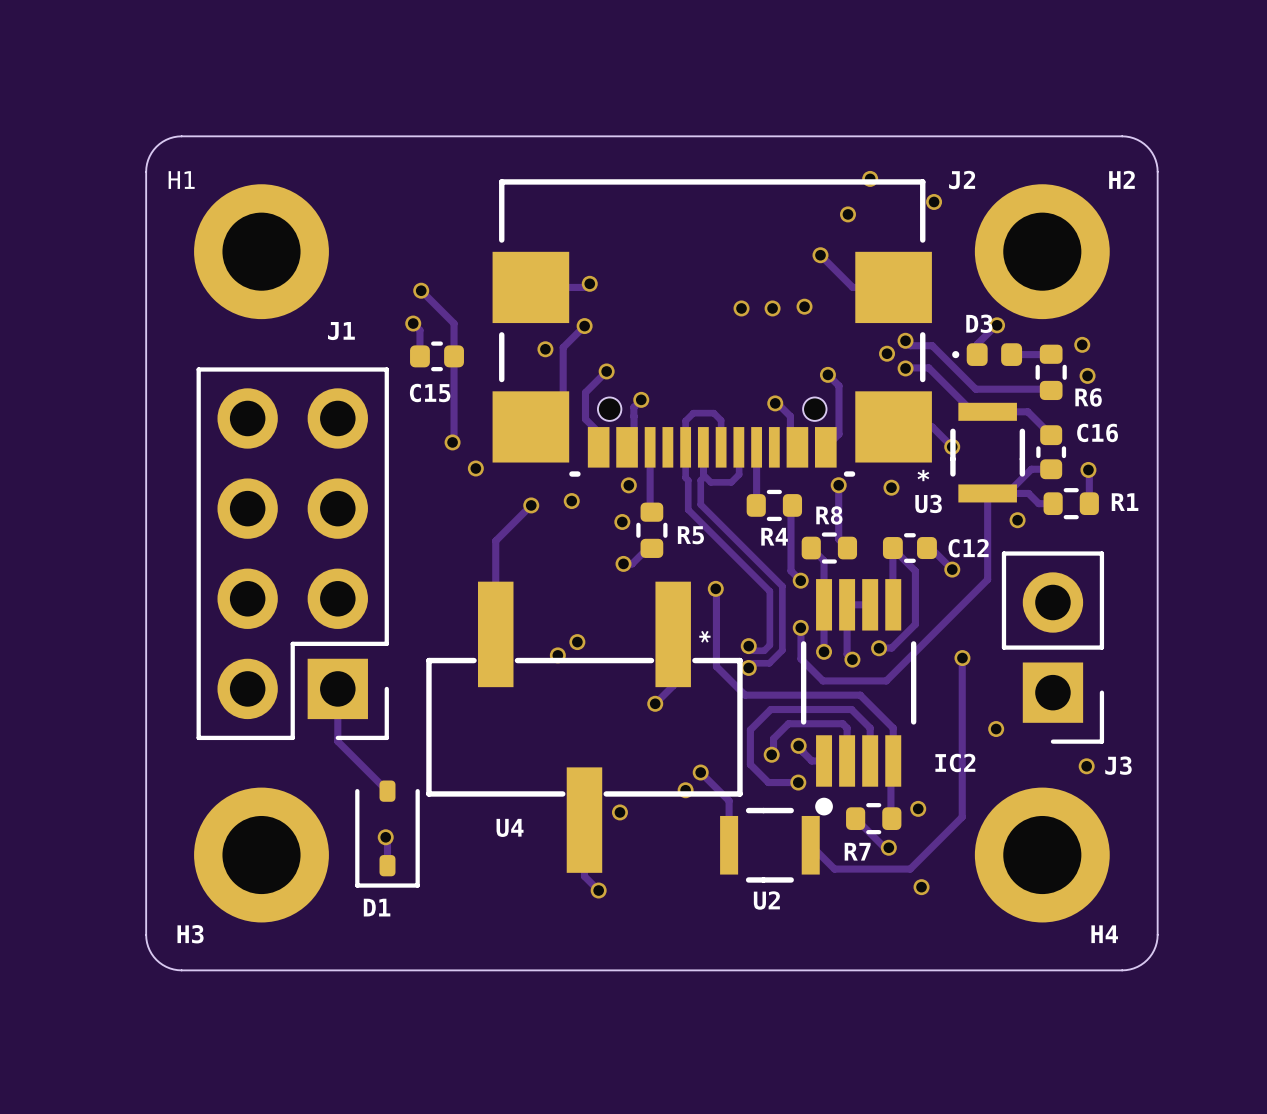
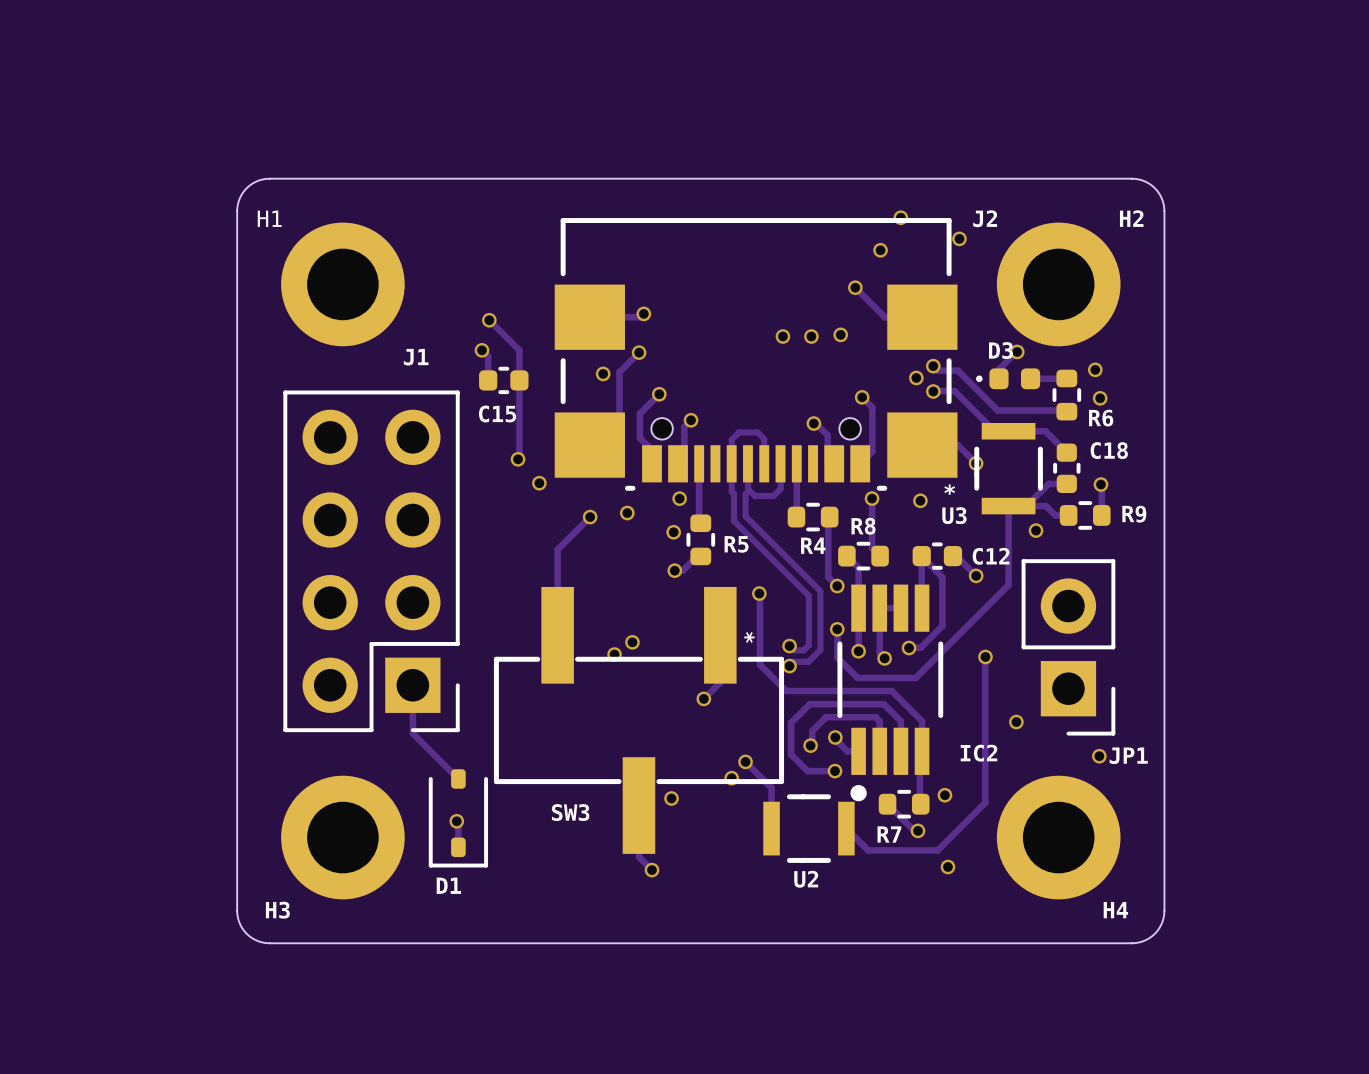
C16 name: C16 (1097, 432) -> C18 (1109, 450)
R1 name: R1 (1125, 502) -> R9 (1134, 514)
J3 name: J3 (1118, 765) -> JP1 (1128, 755)
U4 name: U4 (510, 827) -> SW3 (570, 812)

